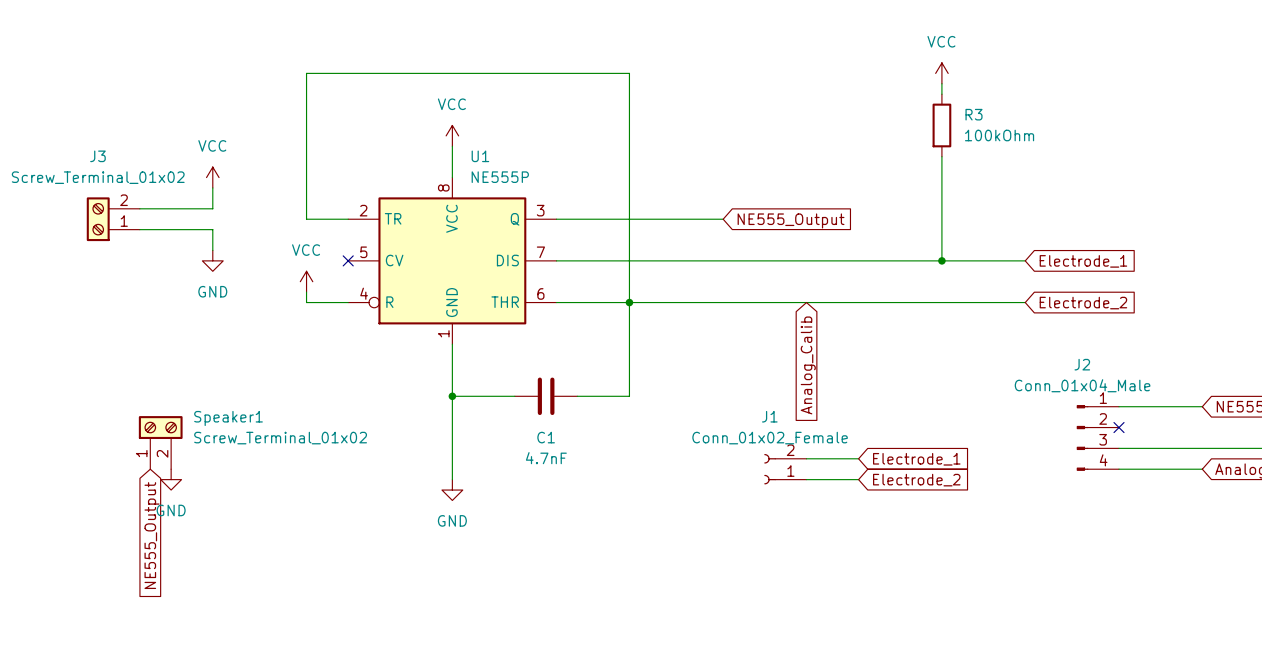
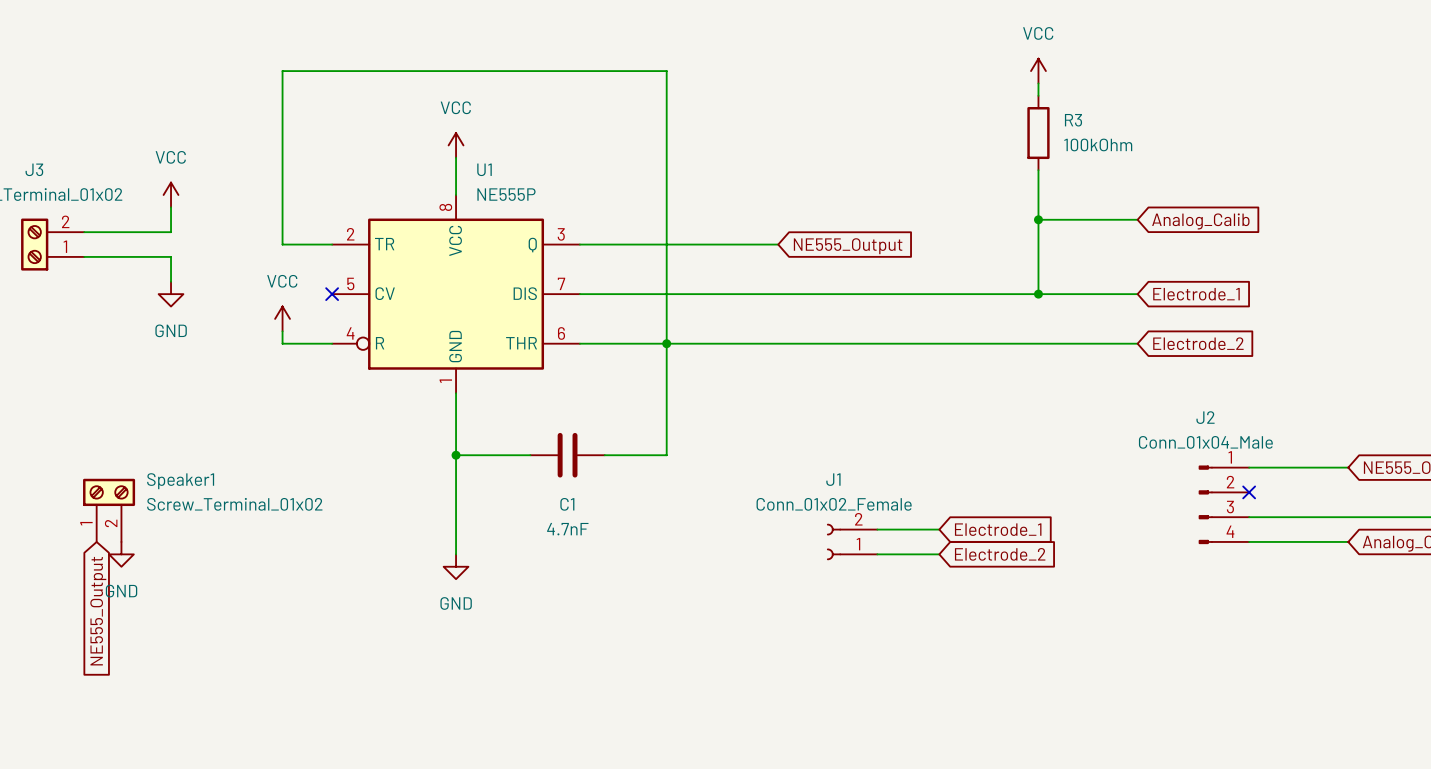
wire: none -> (1038, 219) (1137, 219)
junction: none -> (1038, 219)
global label: none -> Analog_Calib (1200, 221)
global label: Analog_Calib (808, 365) -> none

